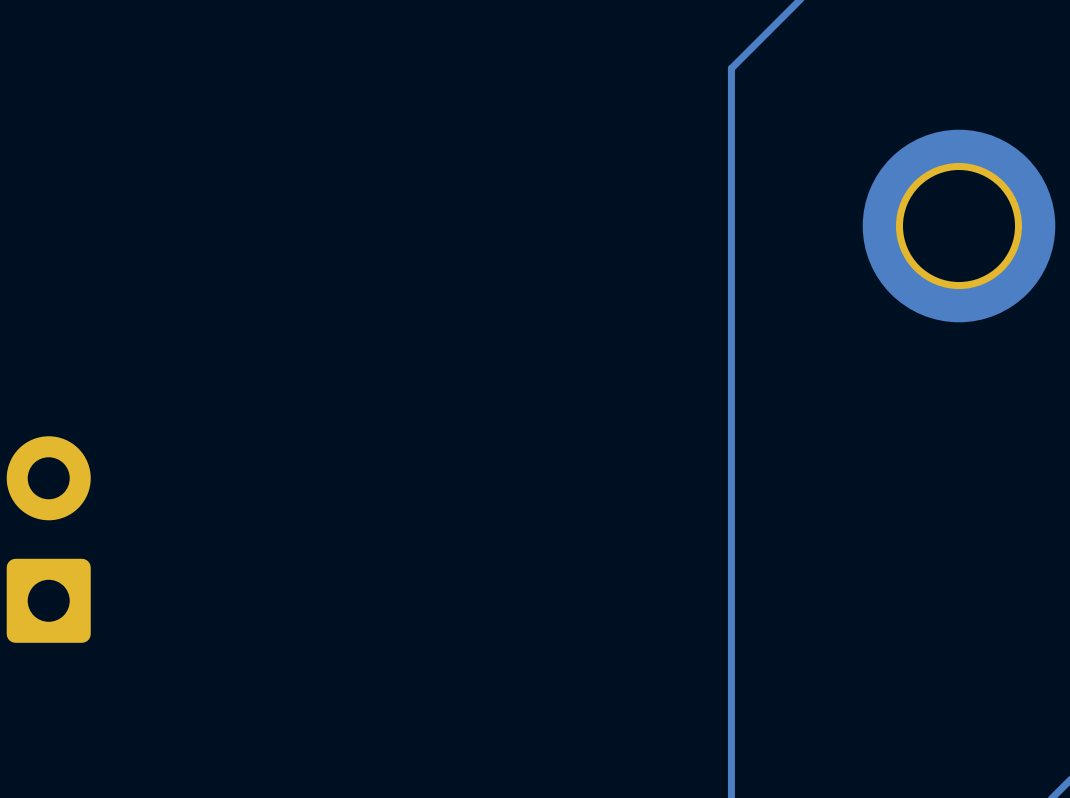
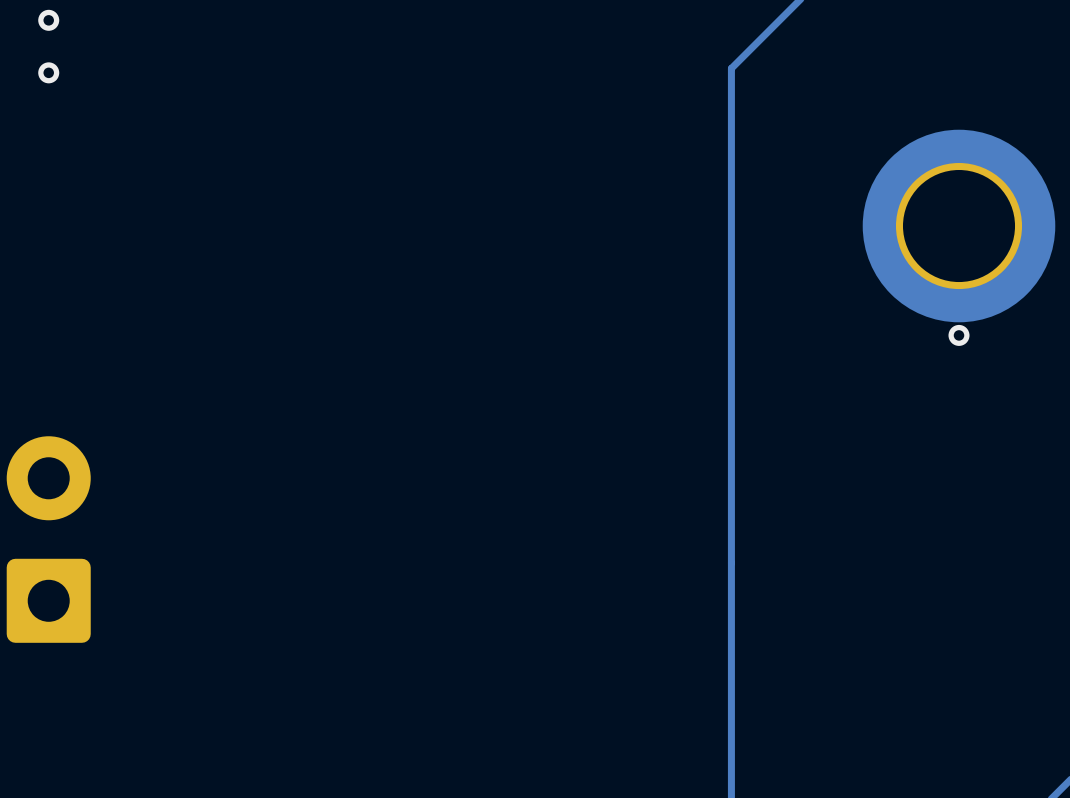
via: none -> (48, 20)
via: none -> (48, 72)
via: none -> (959, 335)

